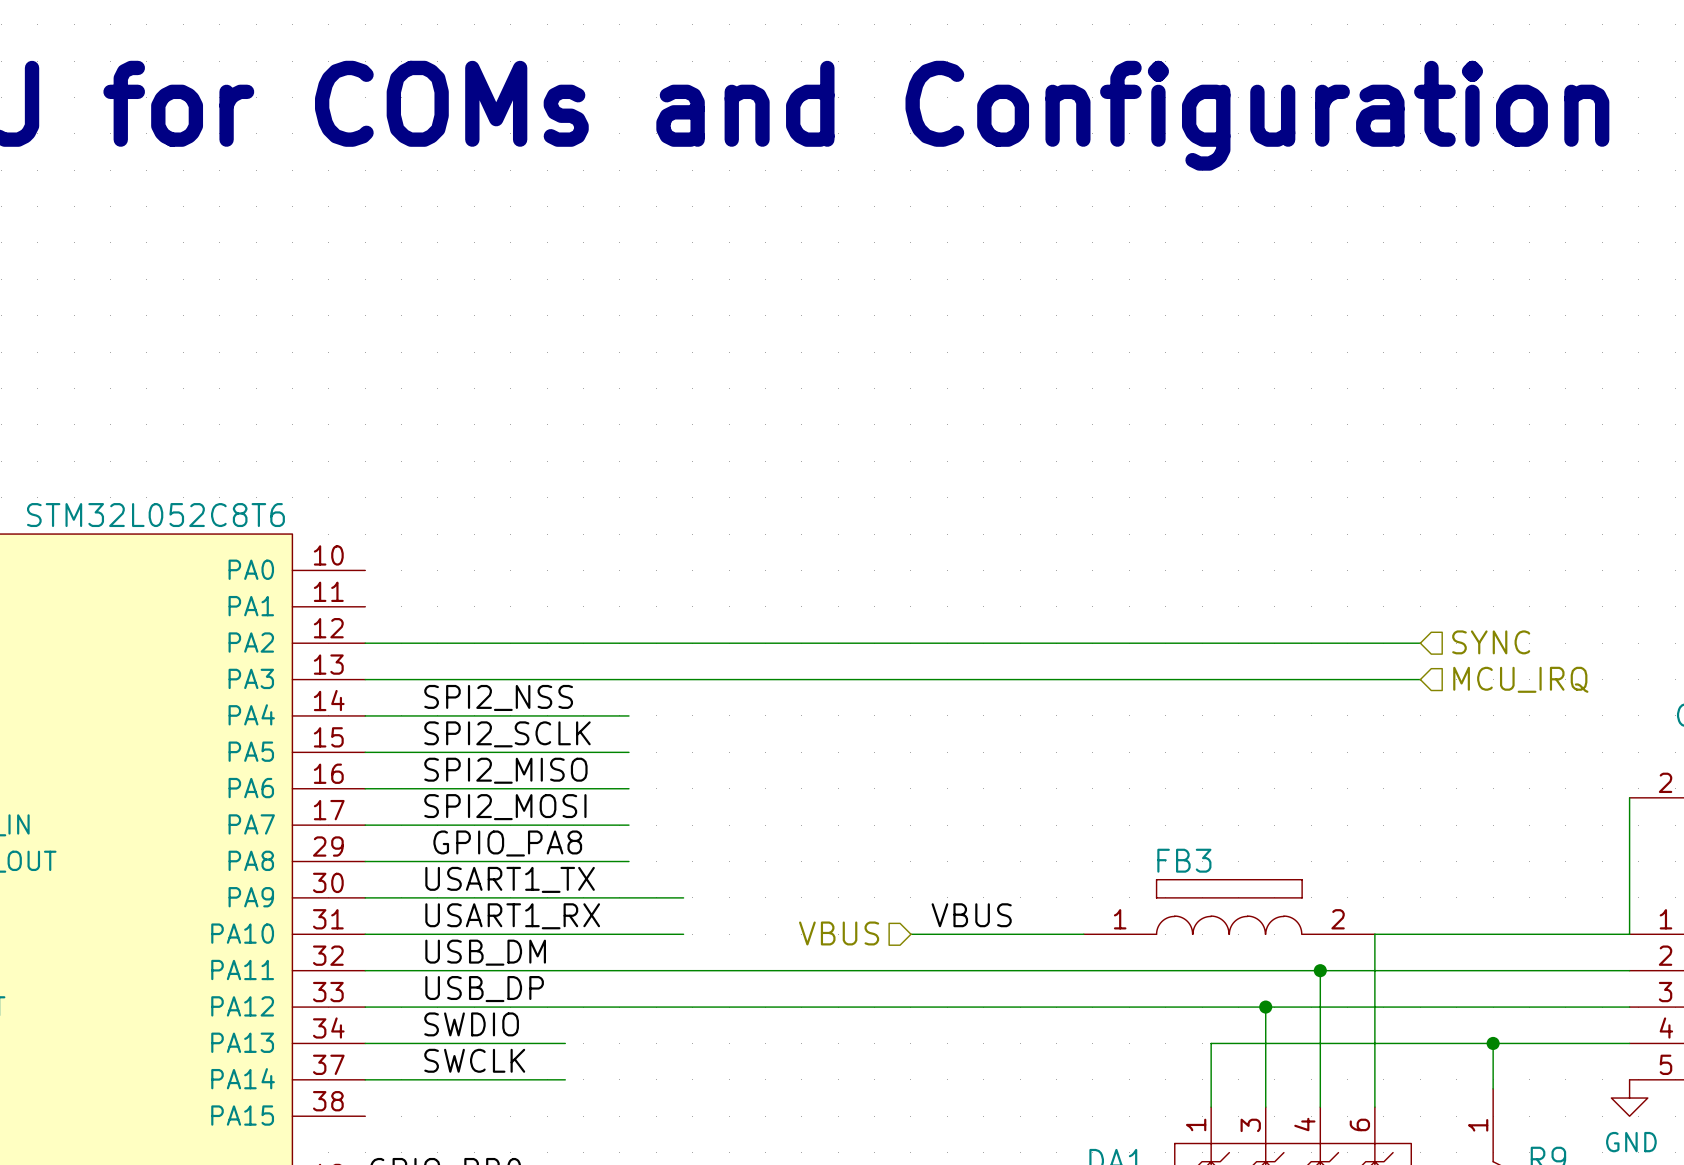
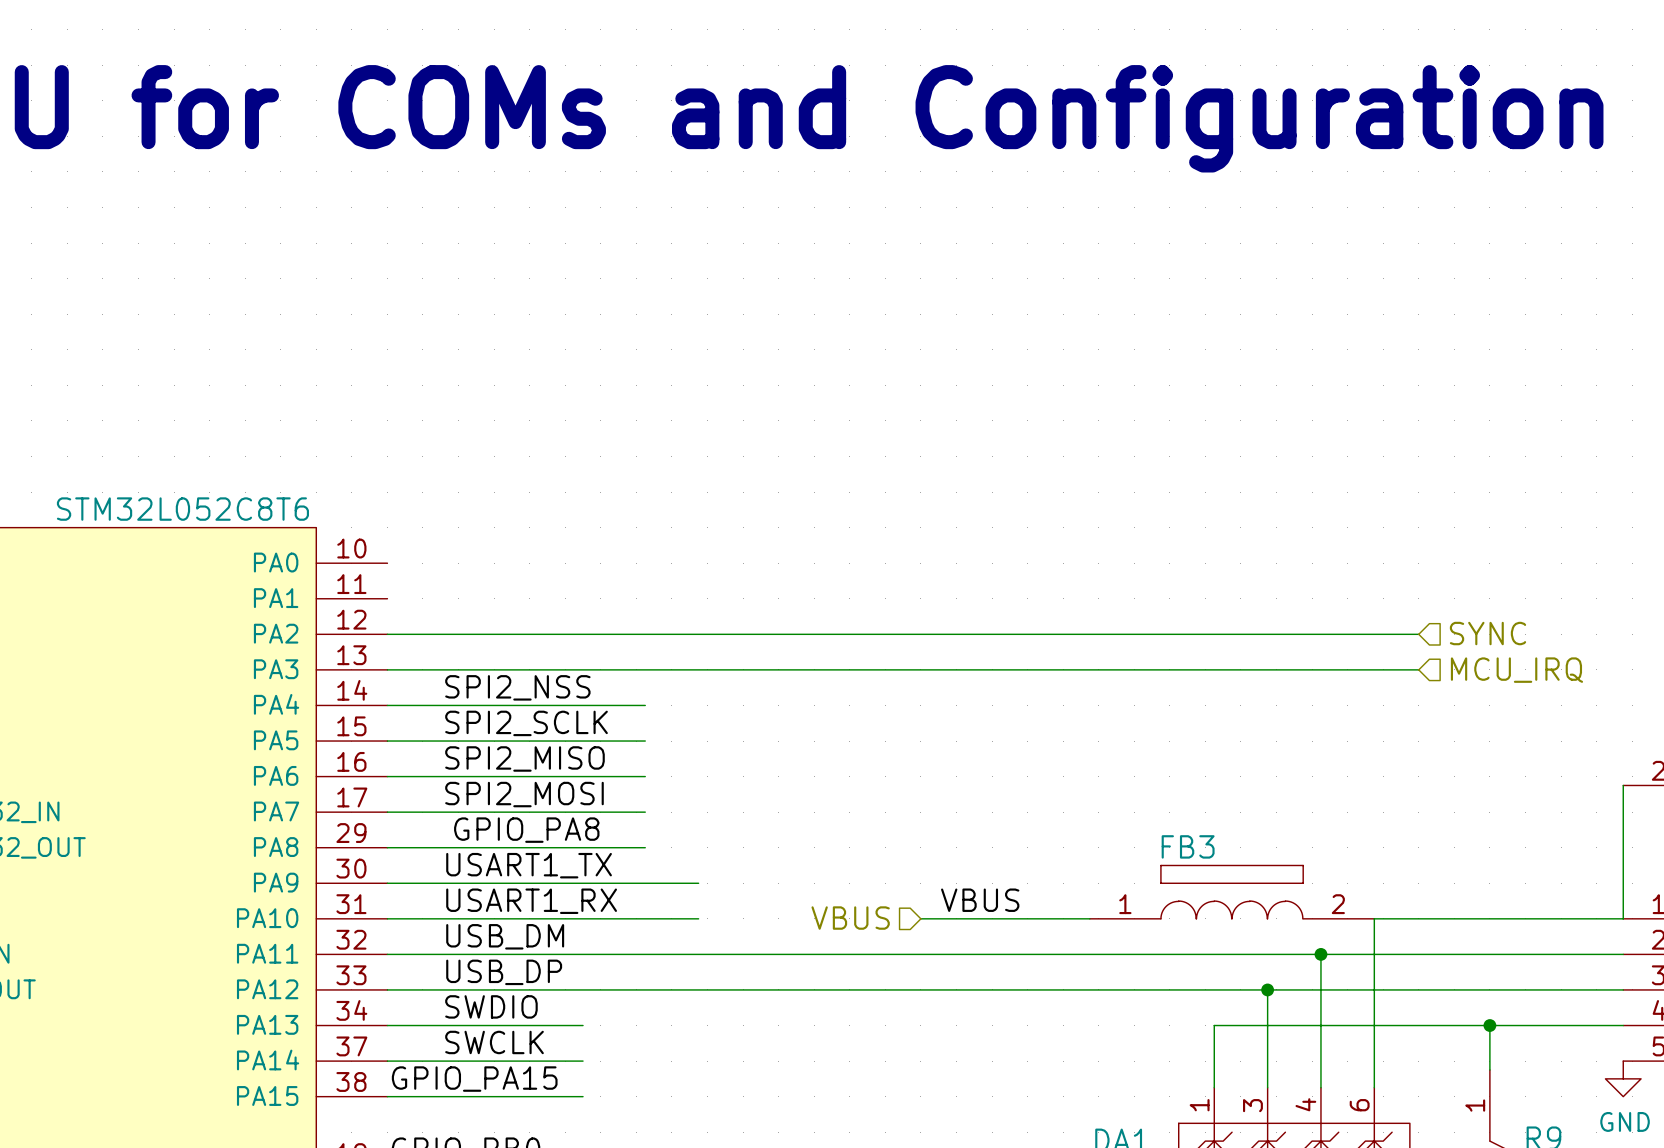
label: none -> GPIO_PA15 (474, 1079)
wire: none -> (387, 1096) (583, 1096)

